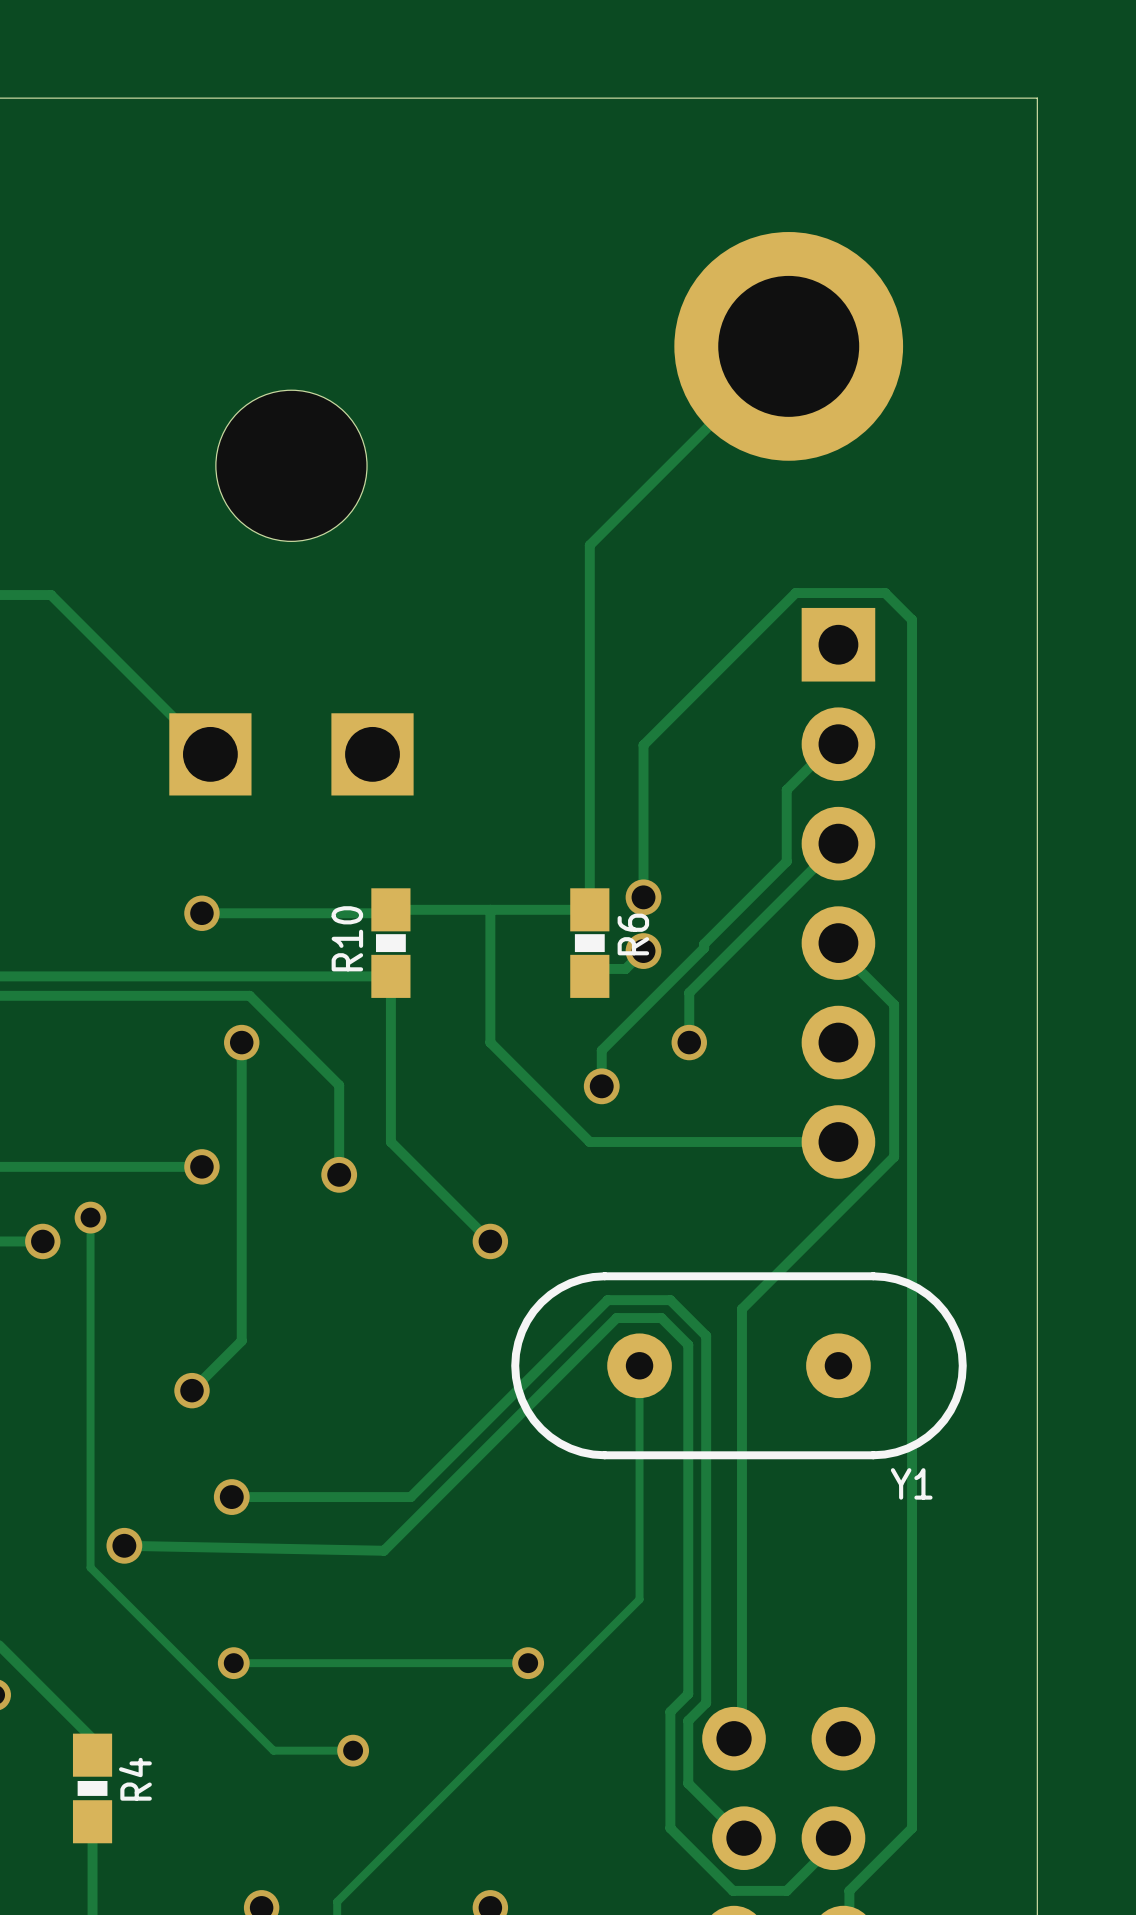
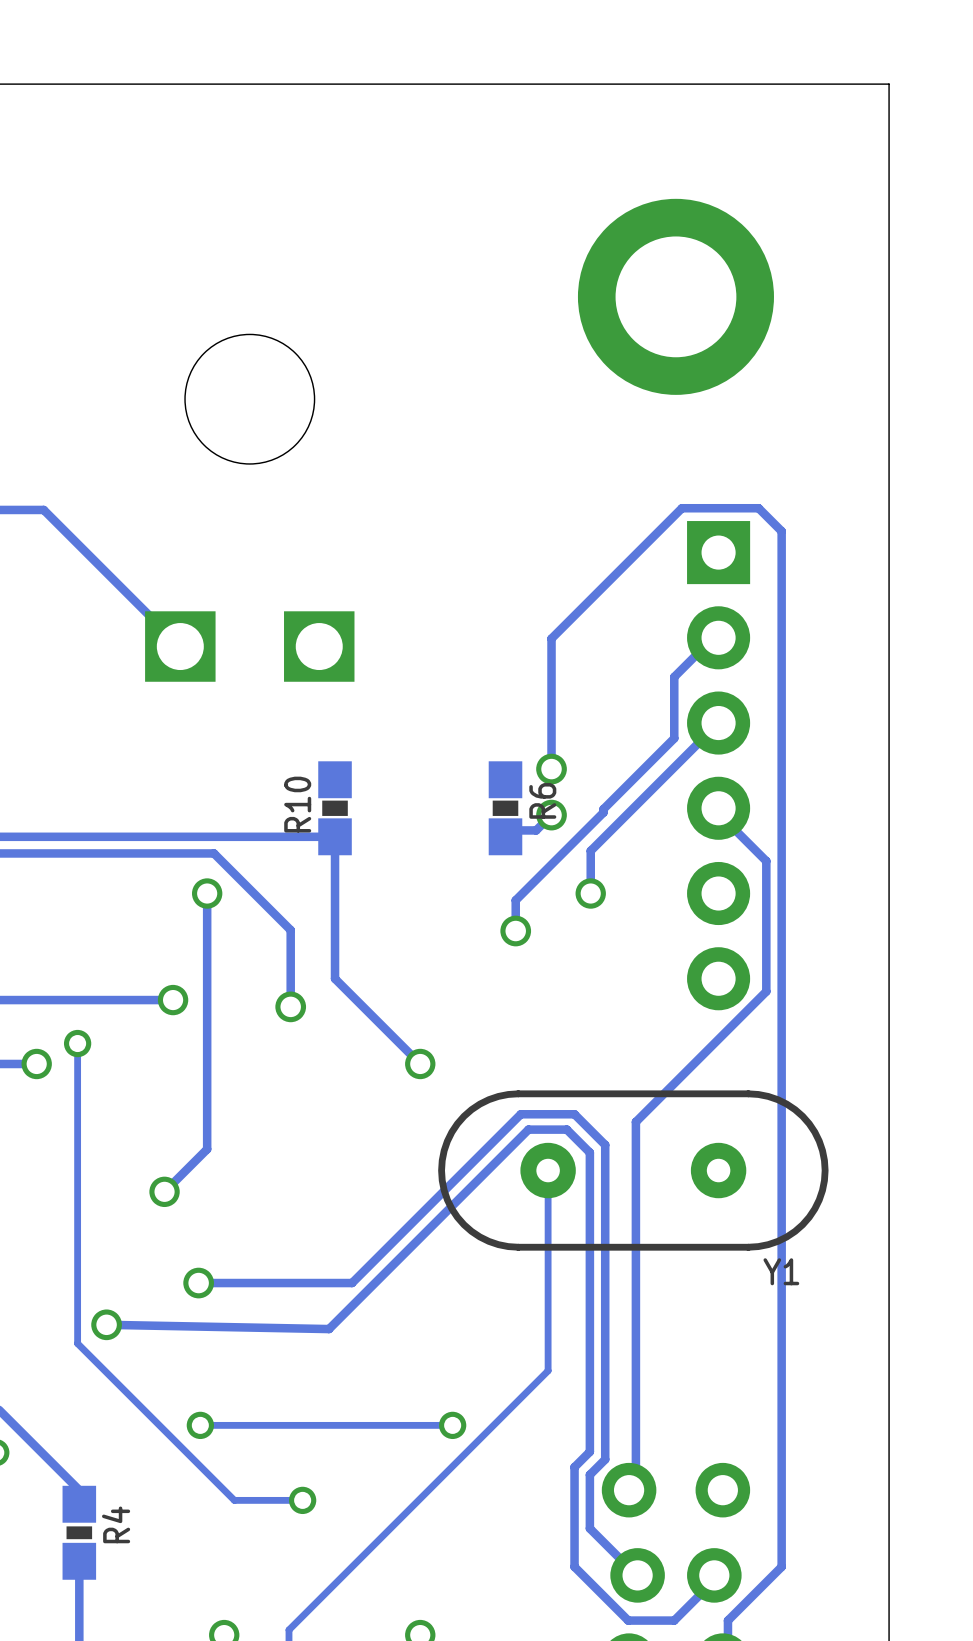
track: (788, 346) (589, 545) (589, 909) (390, 909) (387, 913) (201, 913) -> none
track: (490, 909) (490, 1042) (589, 1142) (838, 1142) -> none
via: (201, 913) -> none

